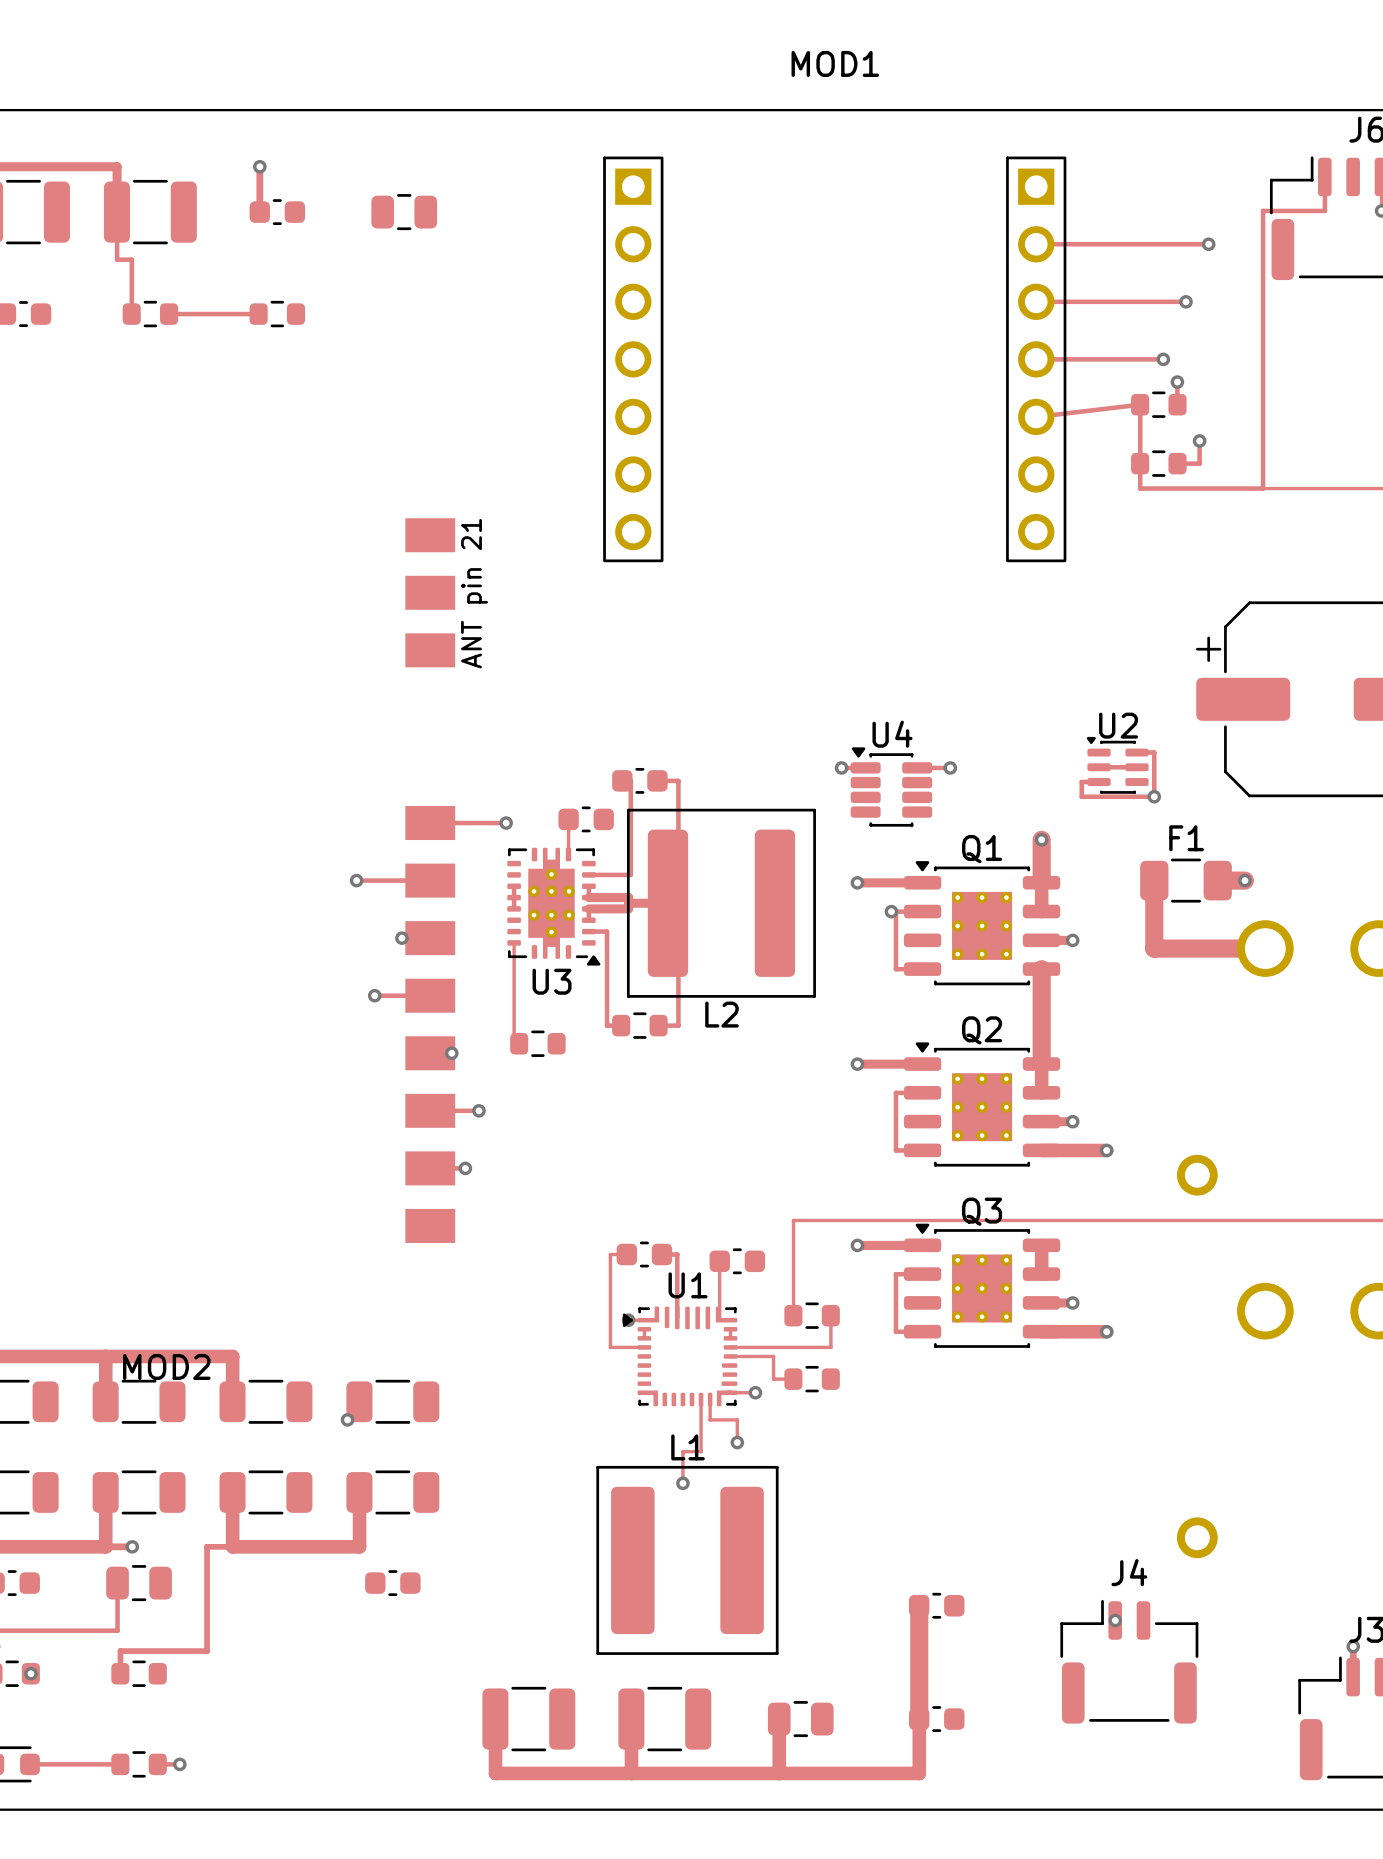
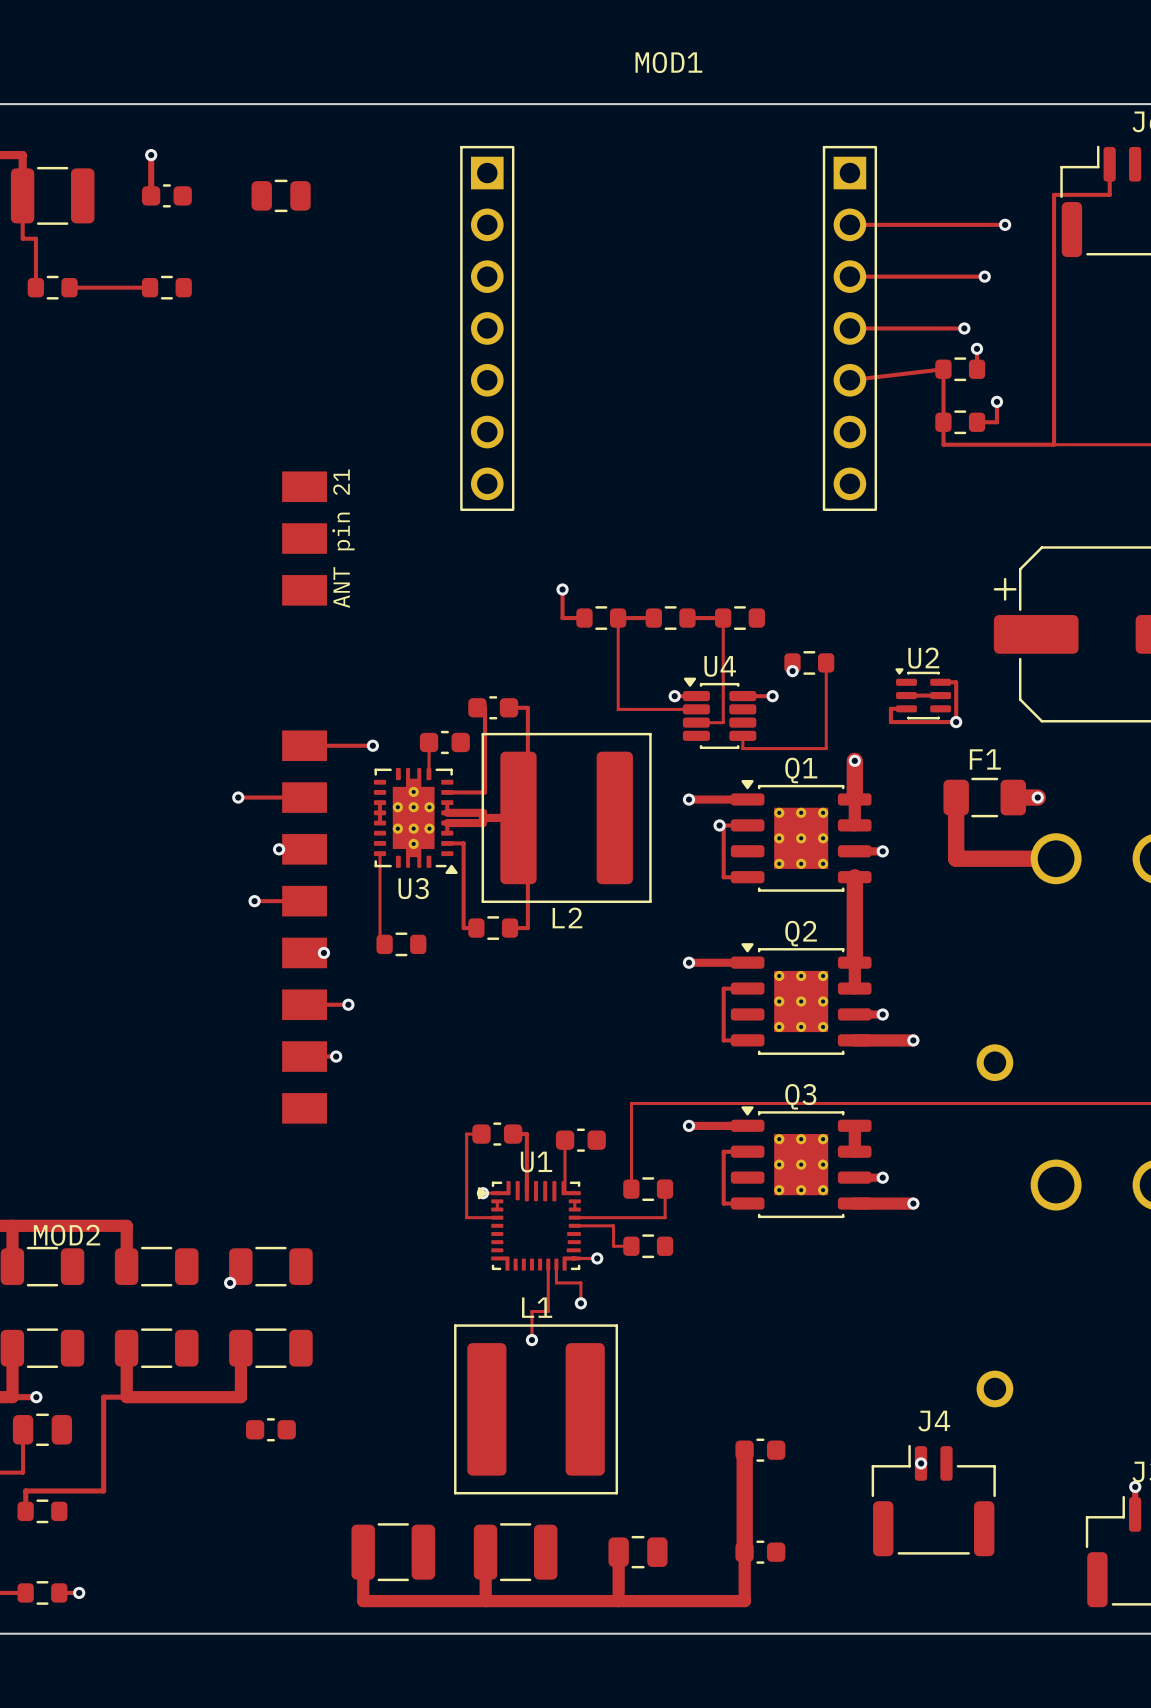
track: none -> (562, 589) (562, 618) (584, 618)
via: none -> (562, 589)
part: none -> (601, 618)
track: none -> (653, 618) (618, 618) (618, 709) (696, 709)
part: none -> (670, 618)
track: none -> (687, 618) (723, 618) (723, 722) (696, 722)
part: none -> (739, 618)
part: none -> (809, 662)
track: none -> (826, 662) (826, 748) (742, 748) (742, 735)
via: none -> (792, 671)

